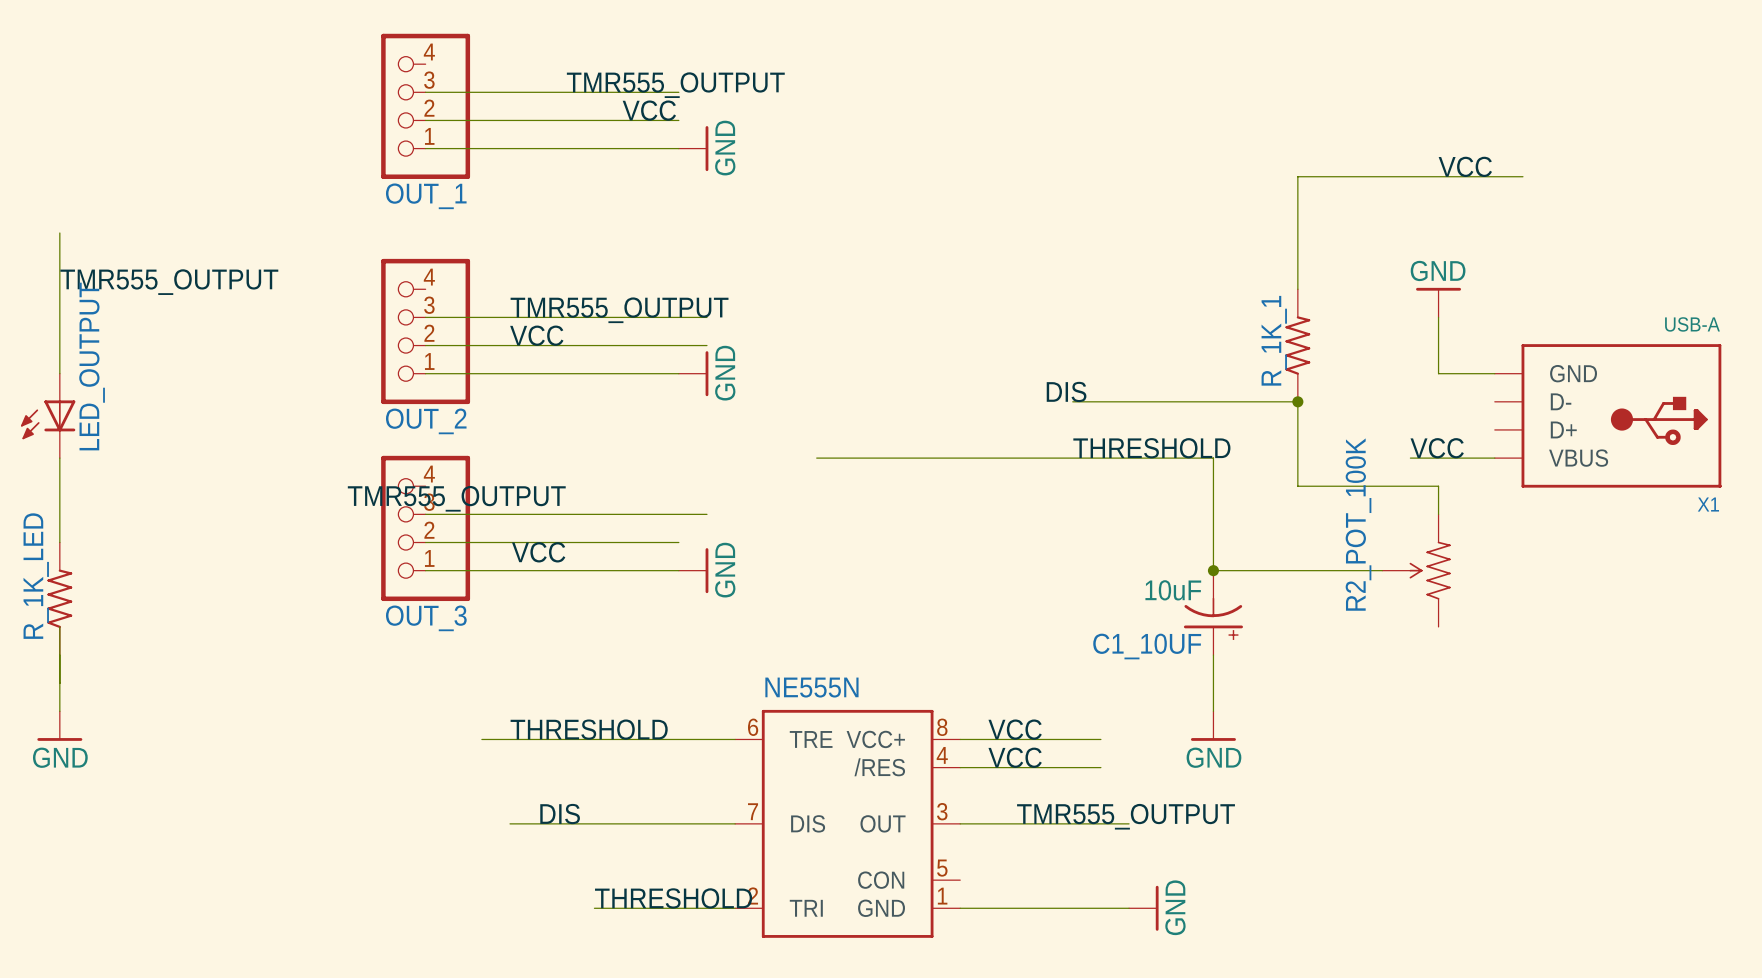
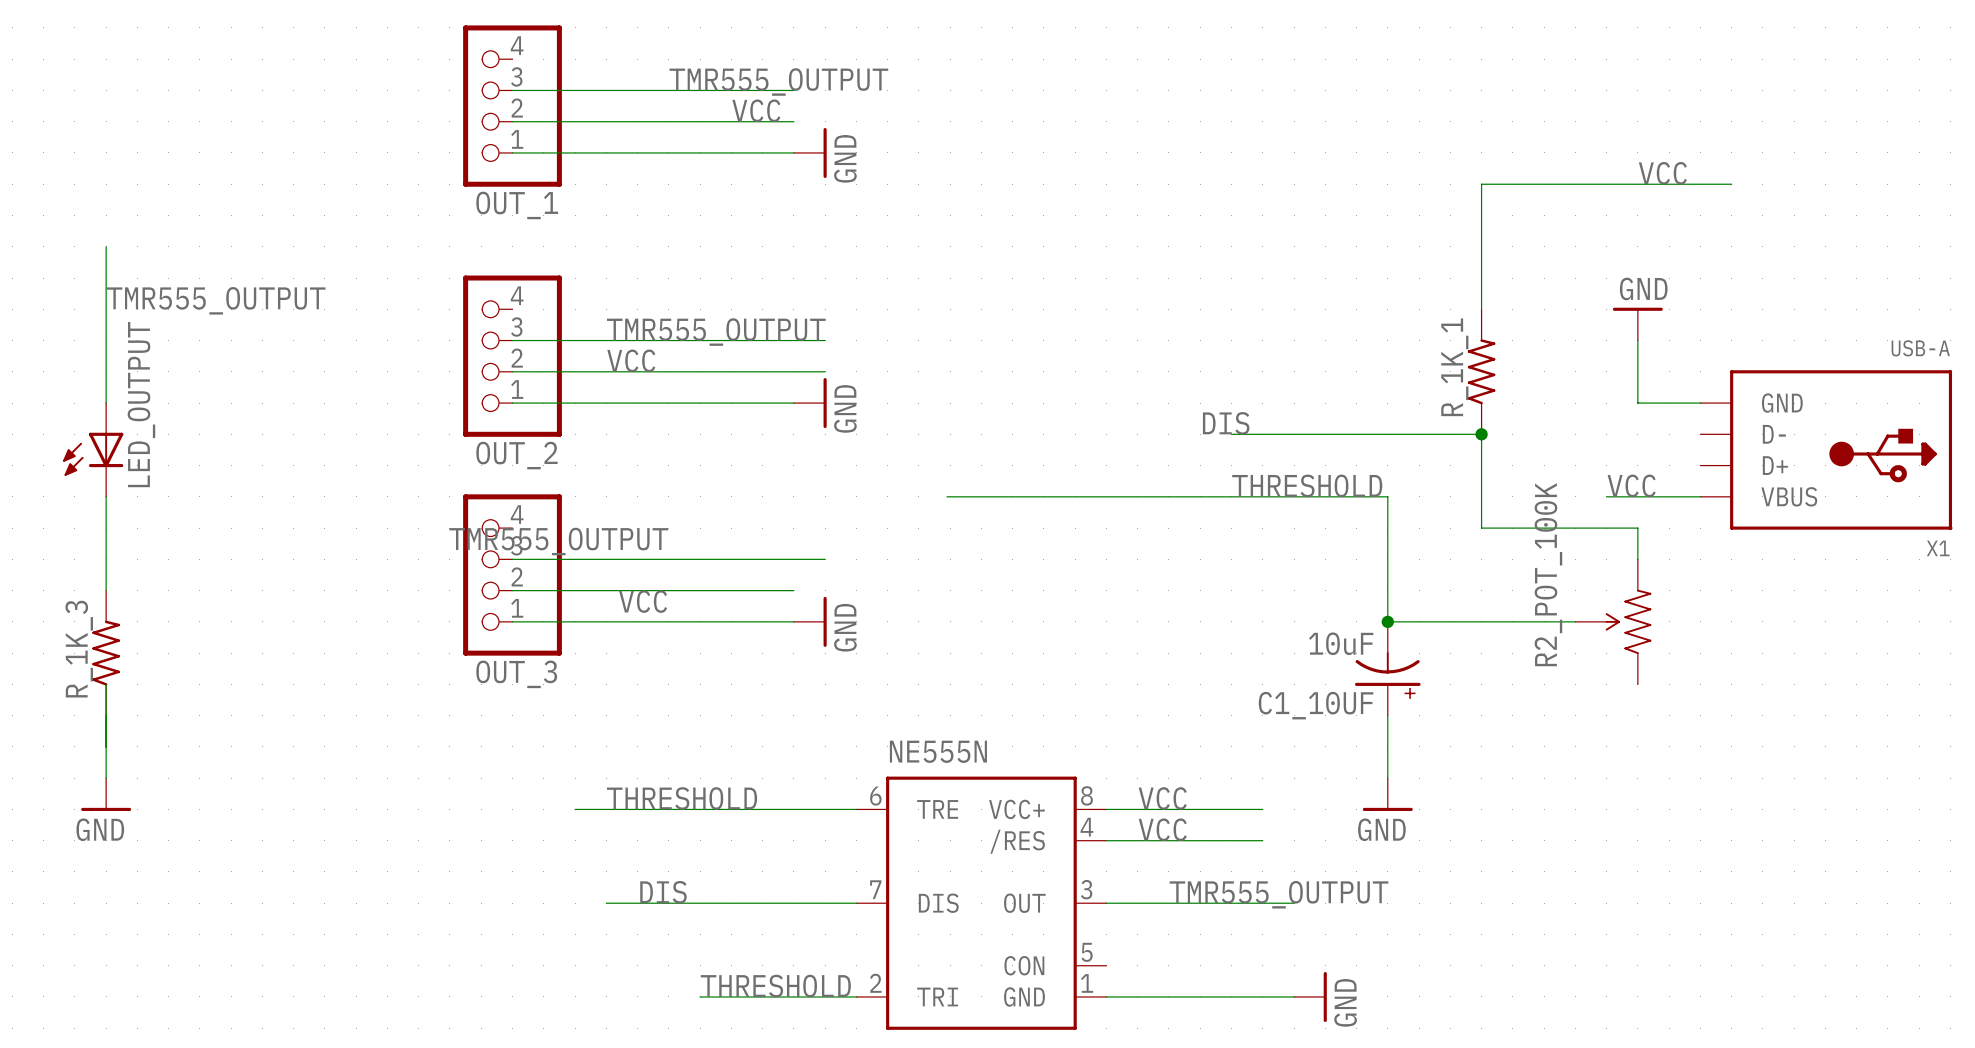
R_1K_LED name: R_1K_LED (36, 576) -> R_1K_3 (79, 649)

